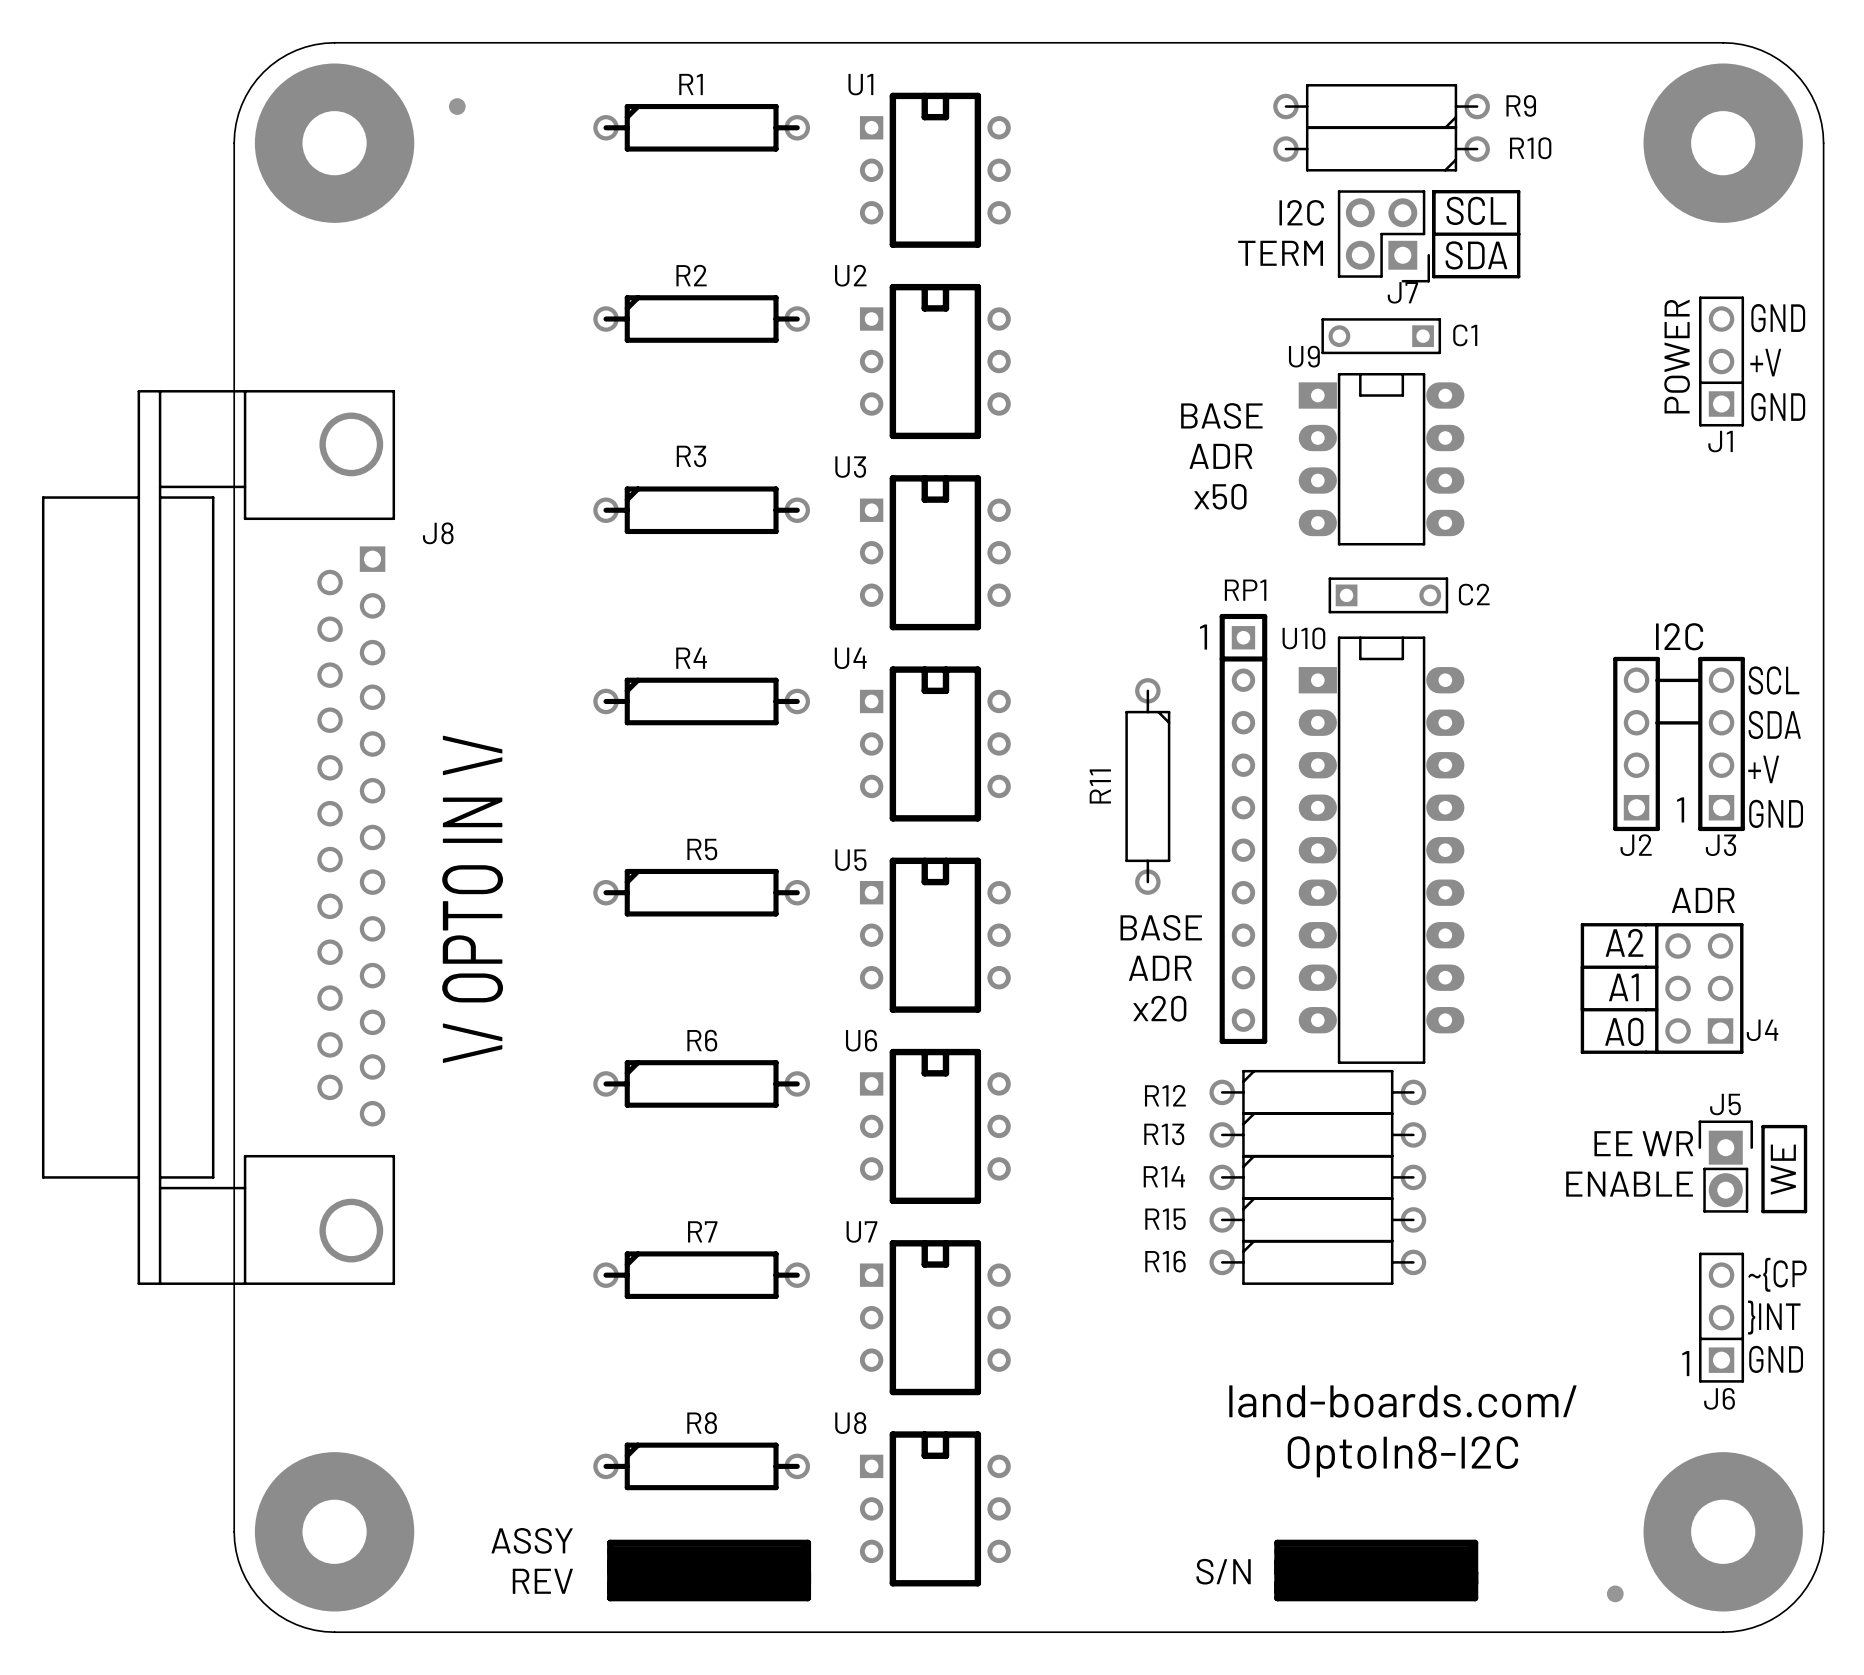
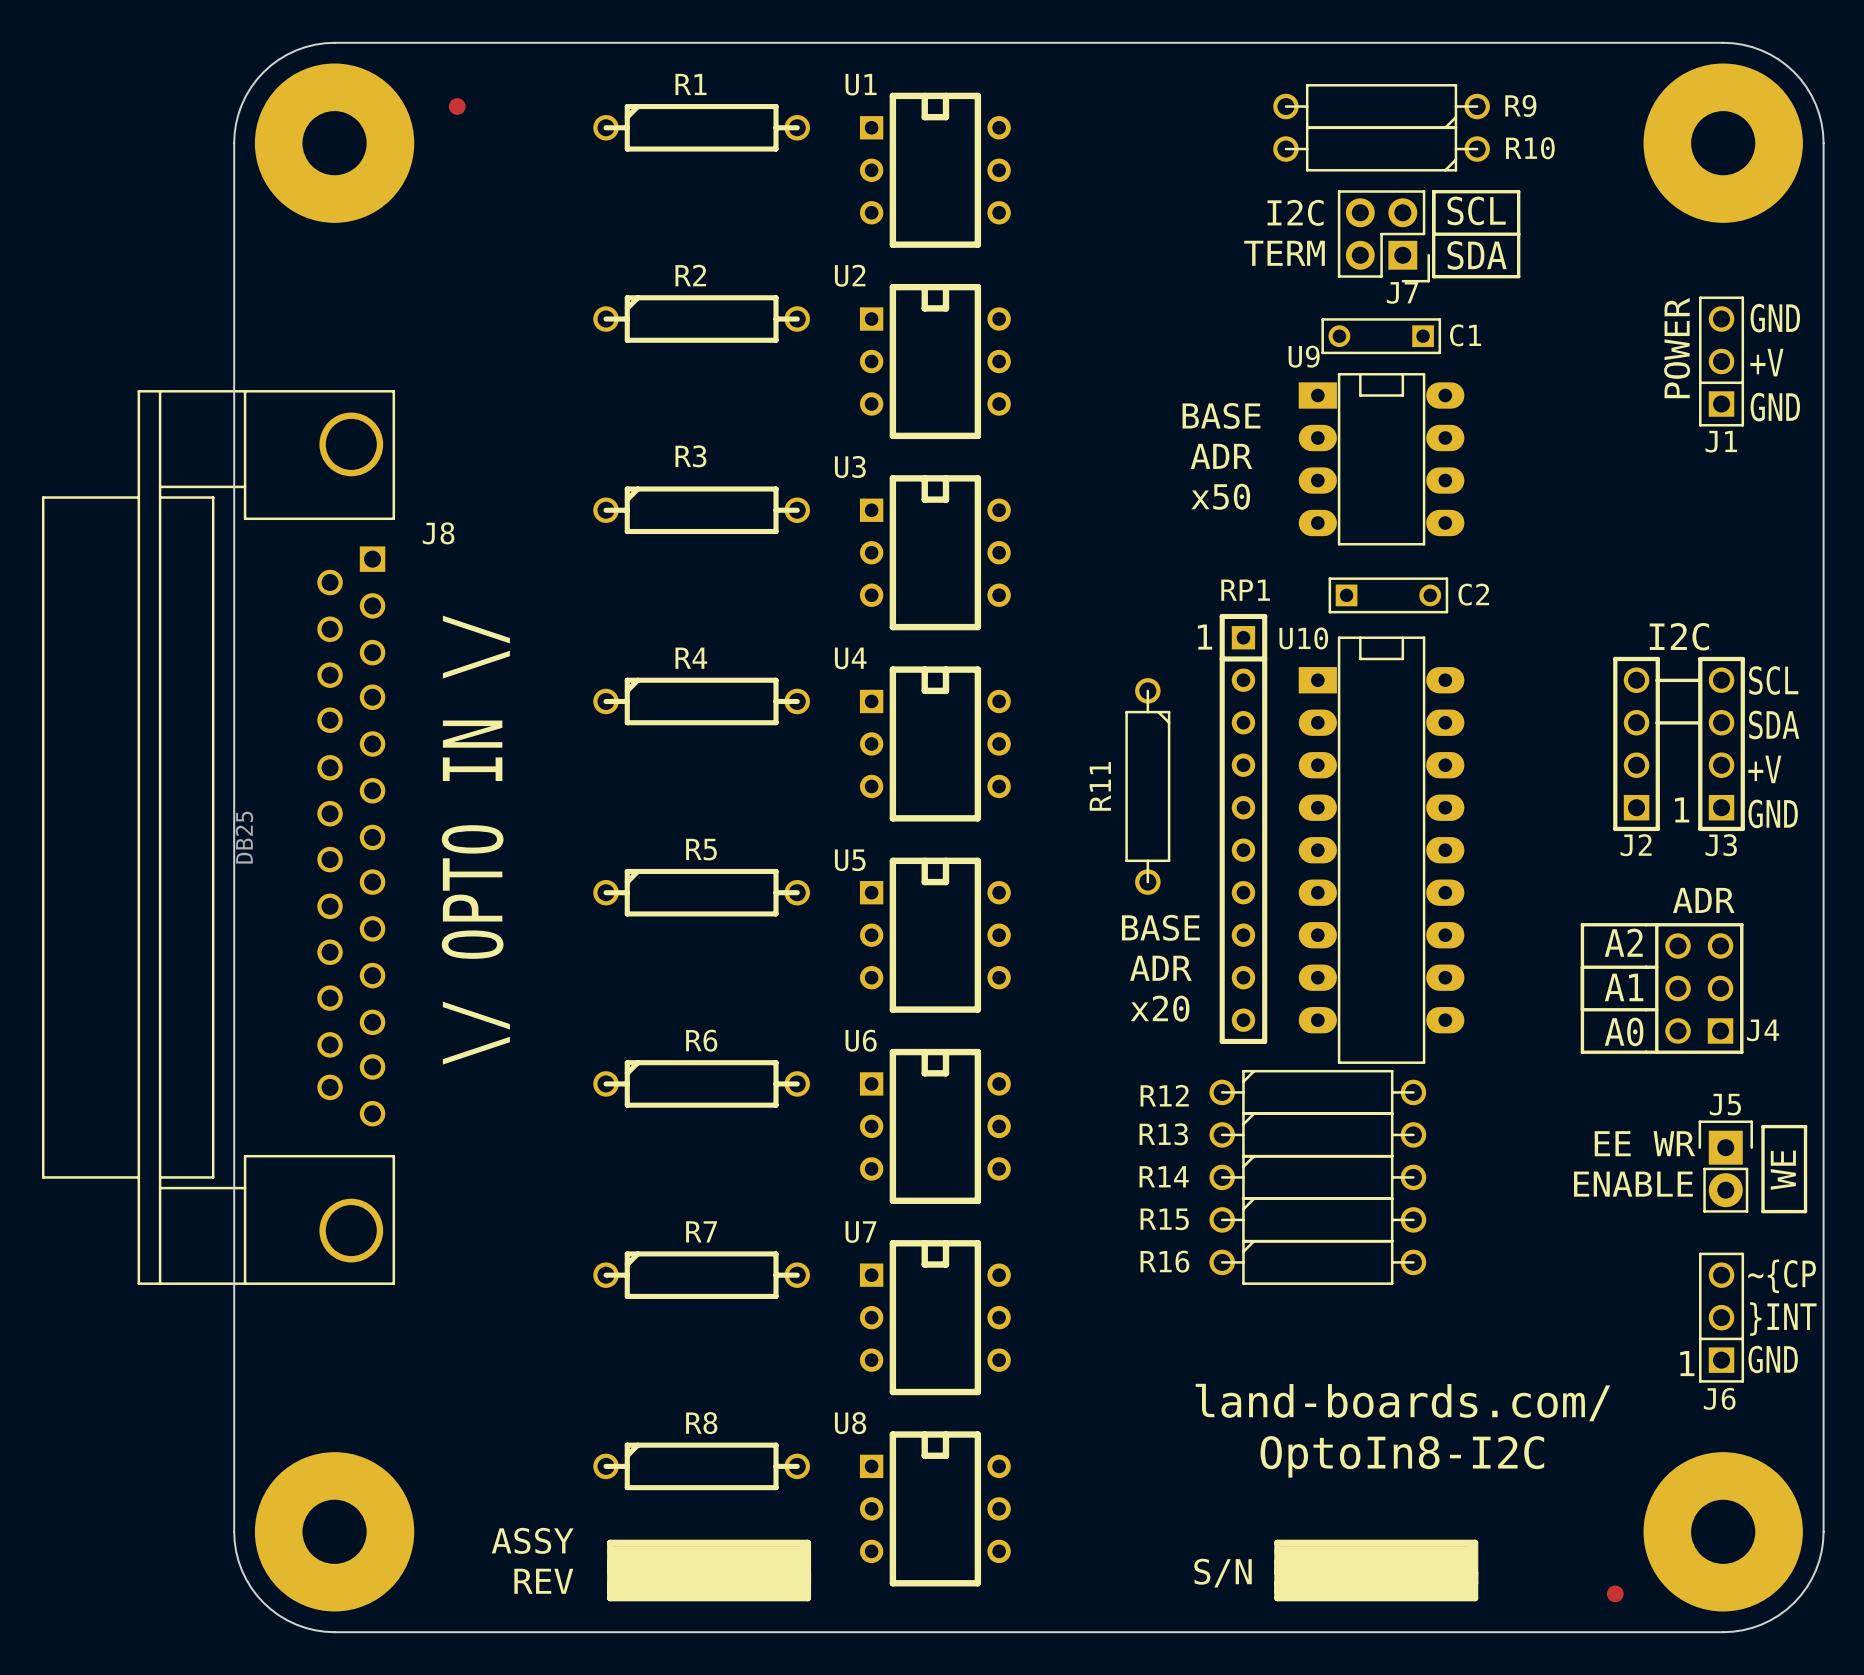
J8 value: none -> DB25 (244, 837)

